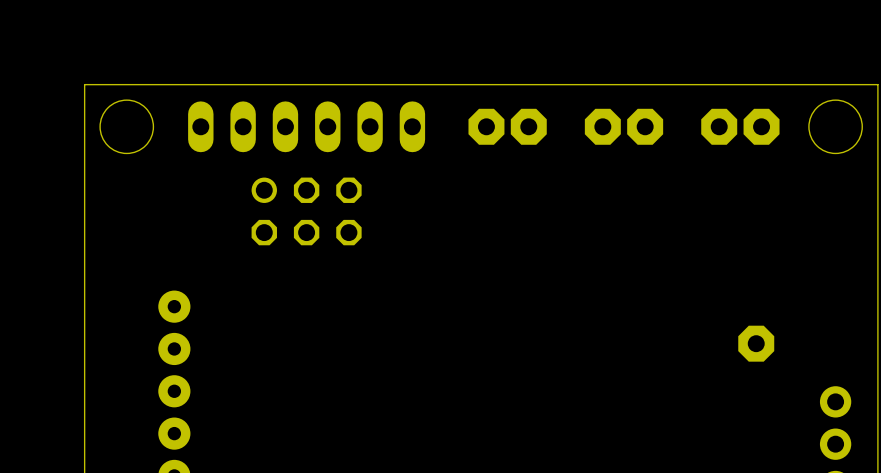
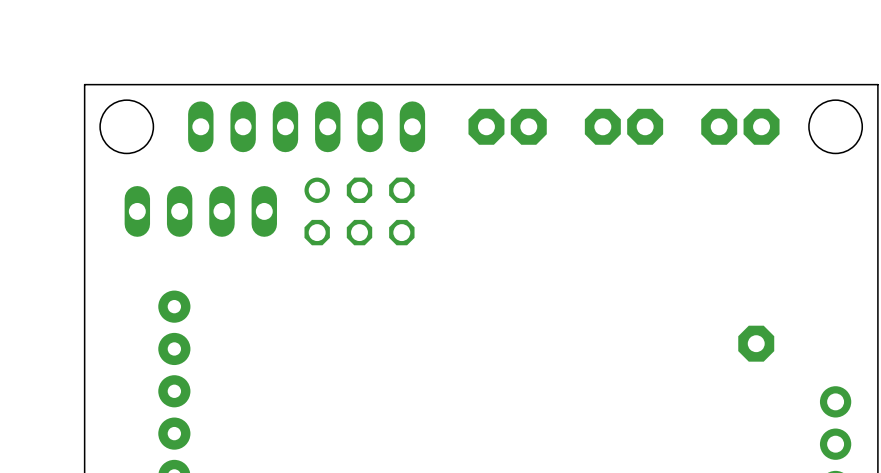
part: none -> (200, 211)
part position: (306, 211) -> (359, 211)

